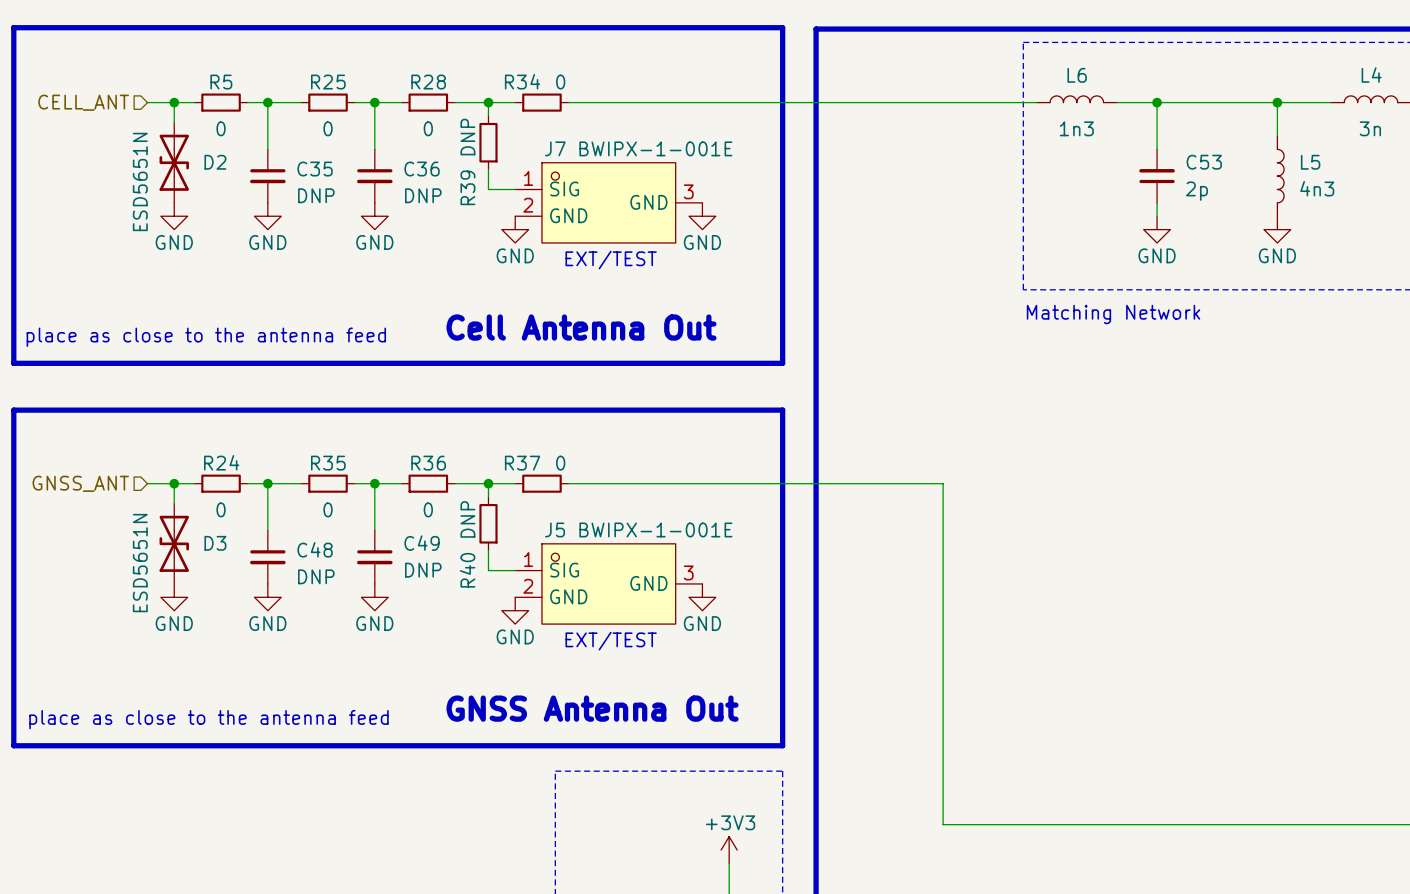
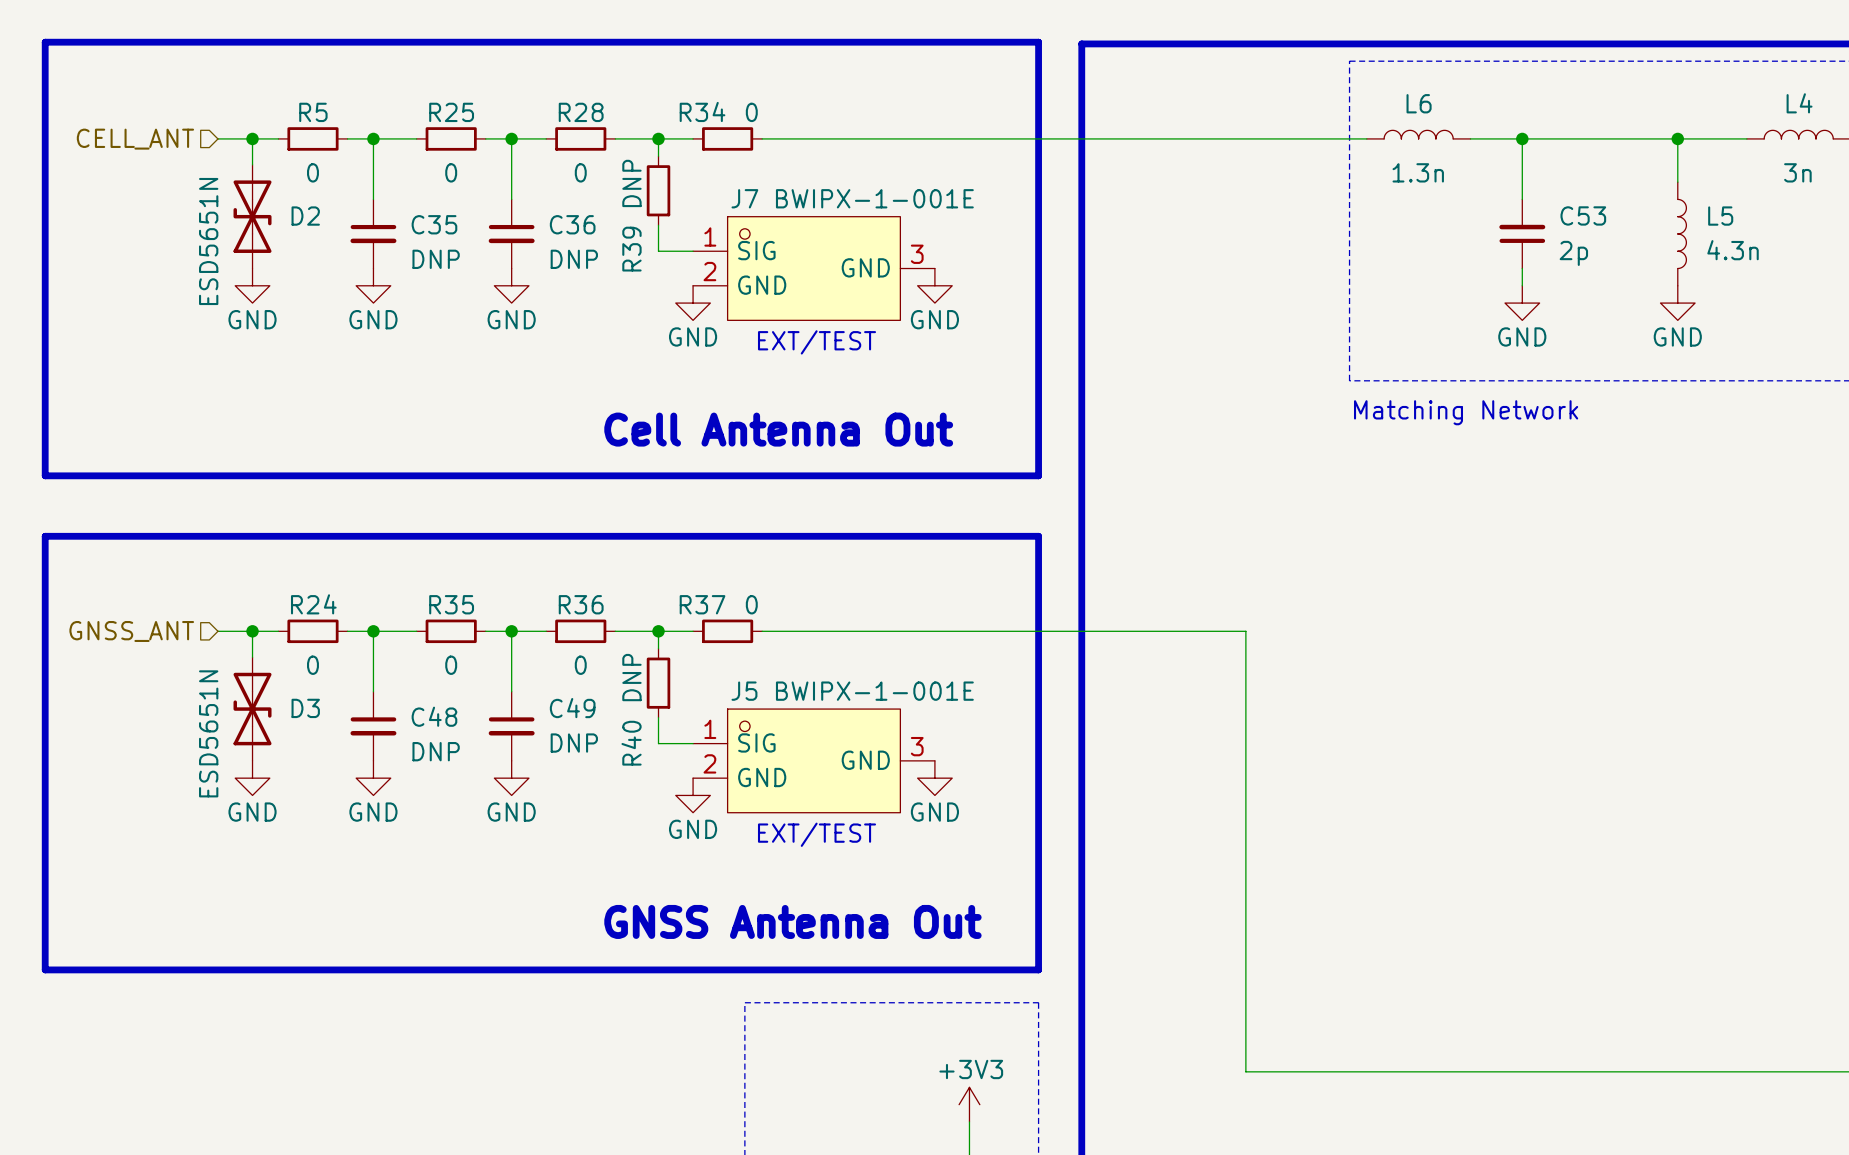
L6 value: 1n3 (1076, 128) -> 1.3n (1418, 172)
L5 value: 4n3 (1317, 188) -> 4.3n (1733, 250)
text: place as close to the antenna feed (206, 337) -> none
text: place as close to the antenna feed (208, 719) -> none

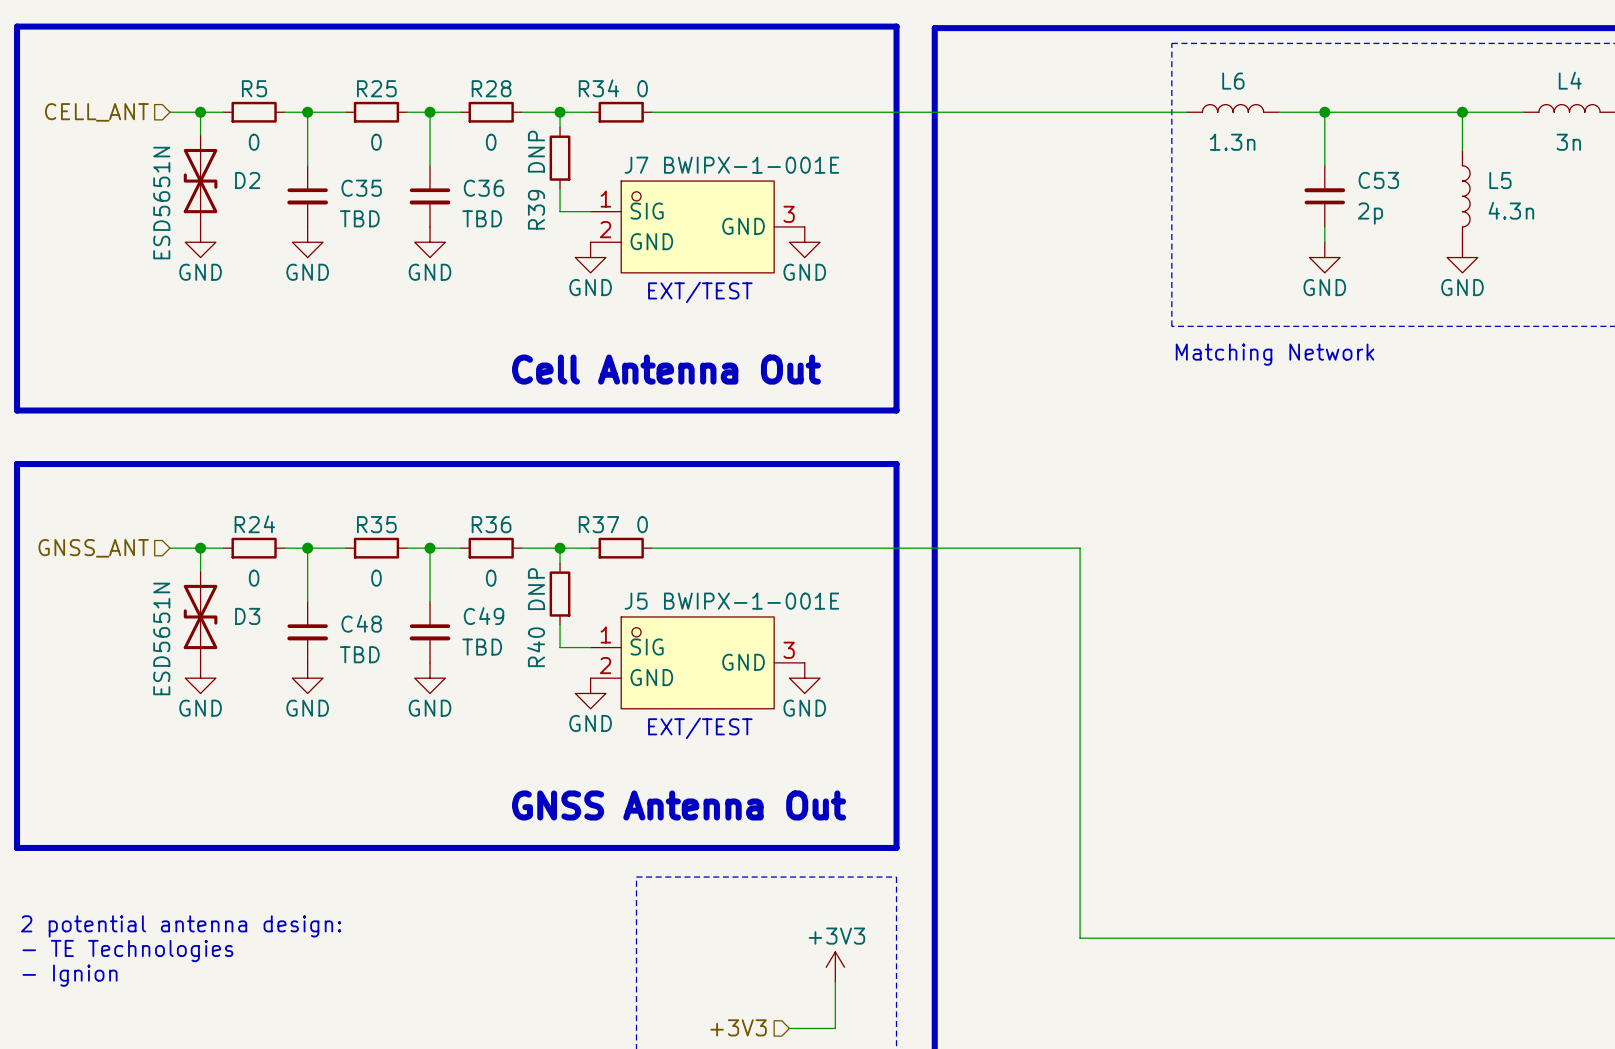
C35 value: DNP (436, 259) -> TBD (359, 218)
C36 value: DNP (574, 259) -> TBD (482, 218)
C49 value: DNP (574, 743) -> TBD (482, 647)
C48 value: DNP (436, 751) -> TBD (359, 654)
text: none -> 2 potential antenna design: (181, 926)
text: none -> - TE Technologies (127, 951)
text: none -> - Ignion (70, 975)

